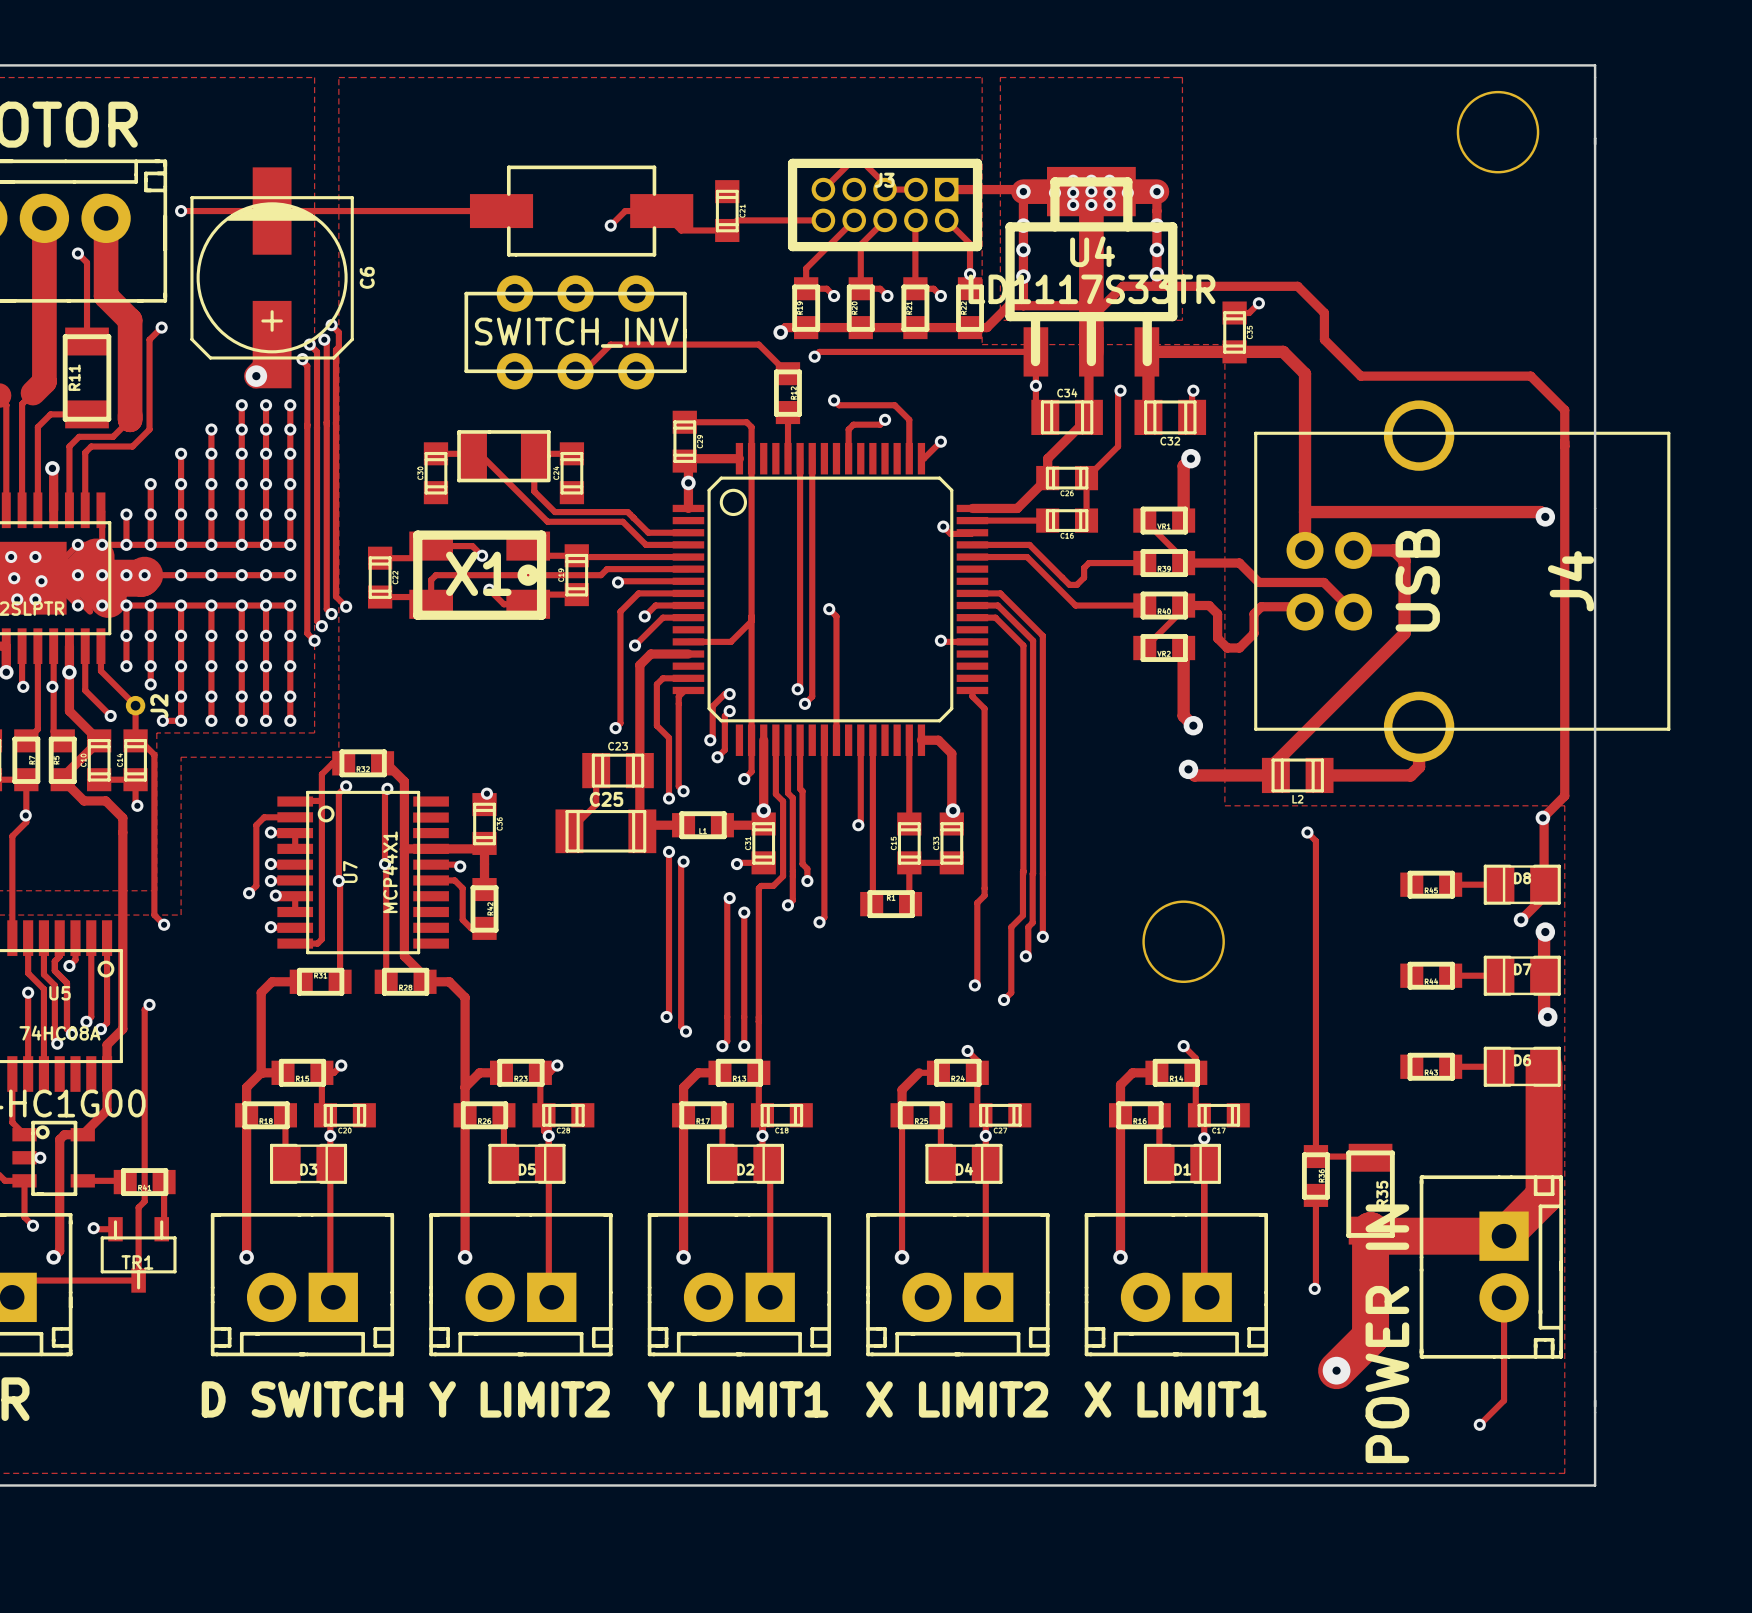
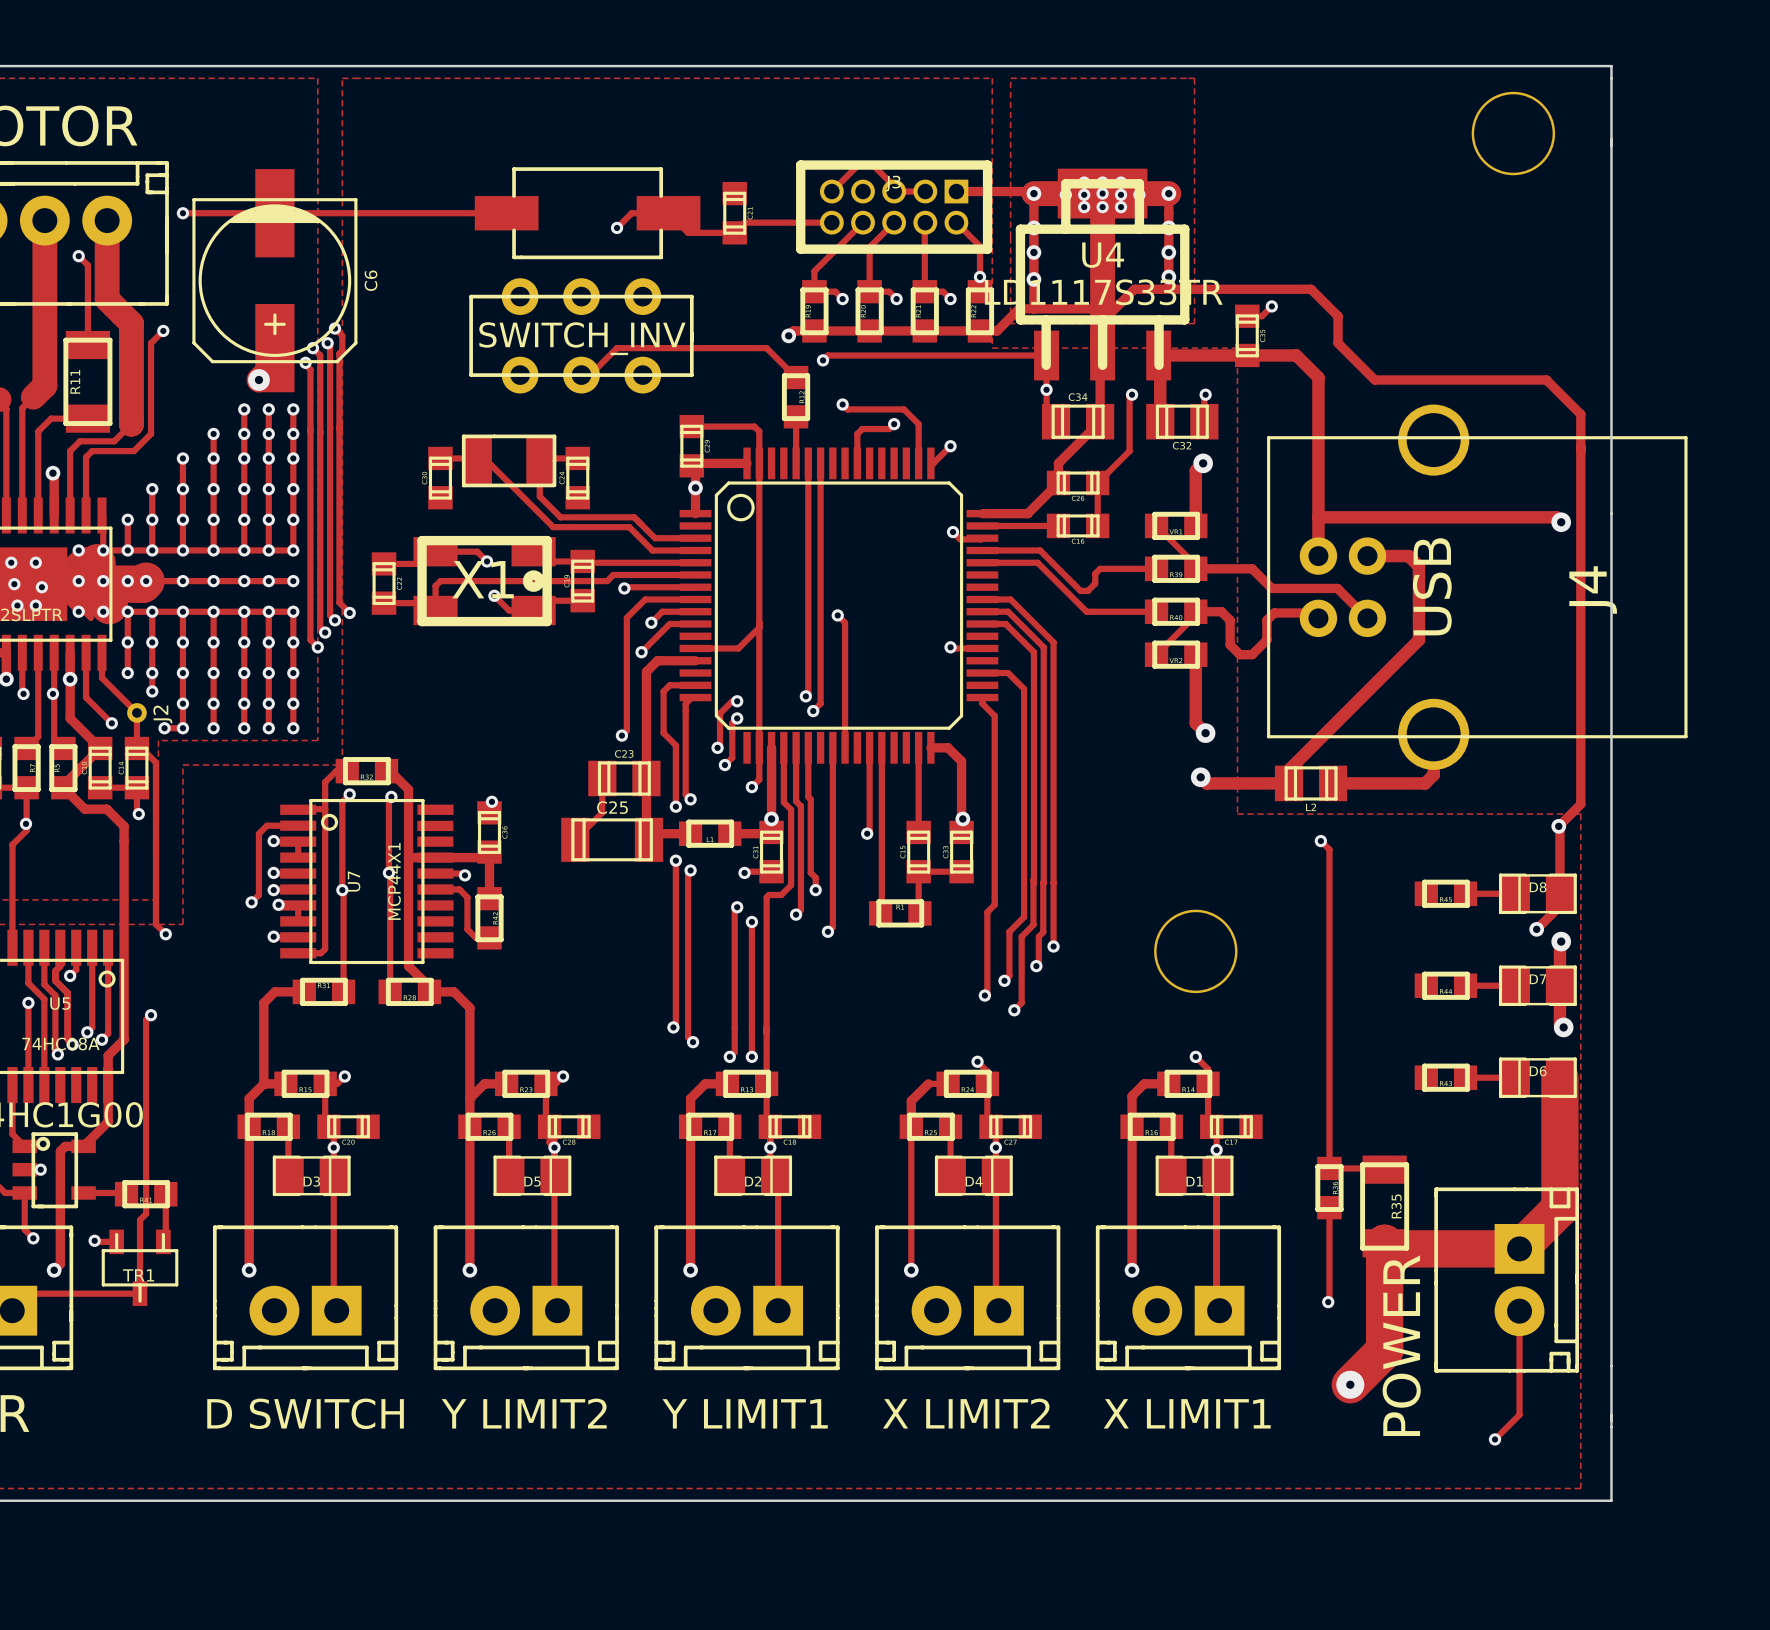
track: none -> (982, 673) (1008, 673) (1024, 689) (1024, 917) (1009, 931) (1009, 975) (1004, 980)
via: none -> (1004, 980)
part value: POWER IN (1387, 1333) -> POWER (1401, 1345)

